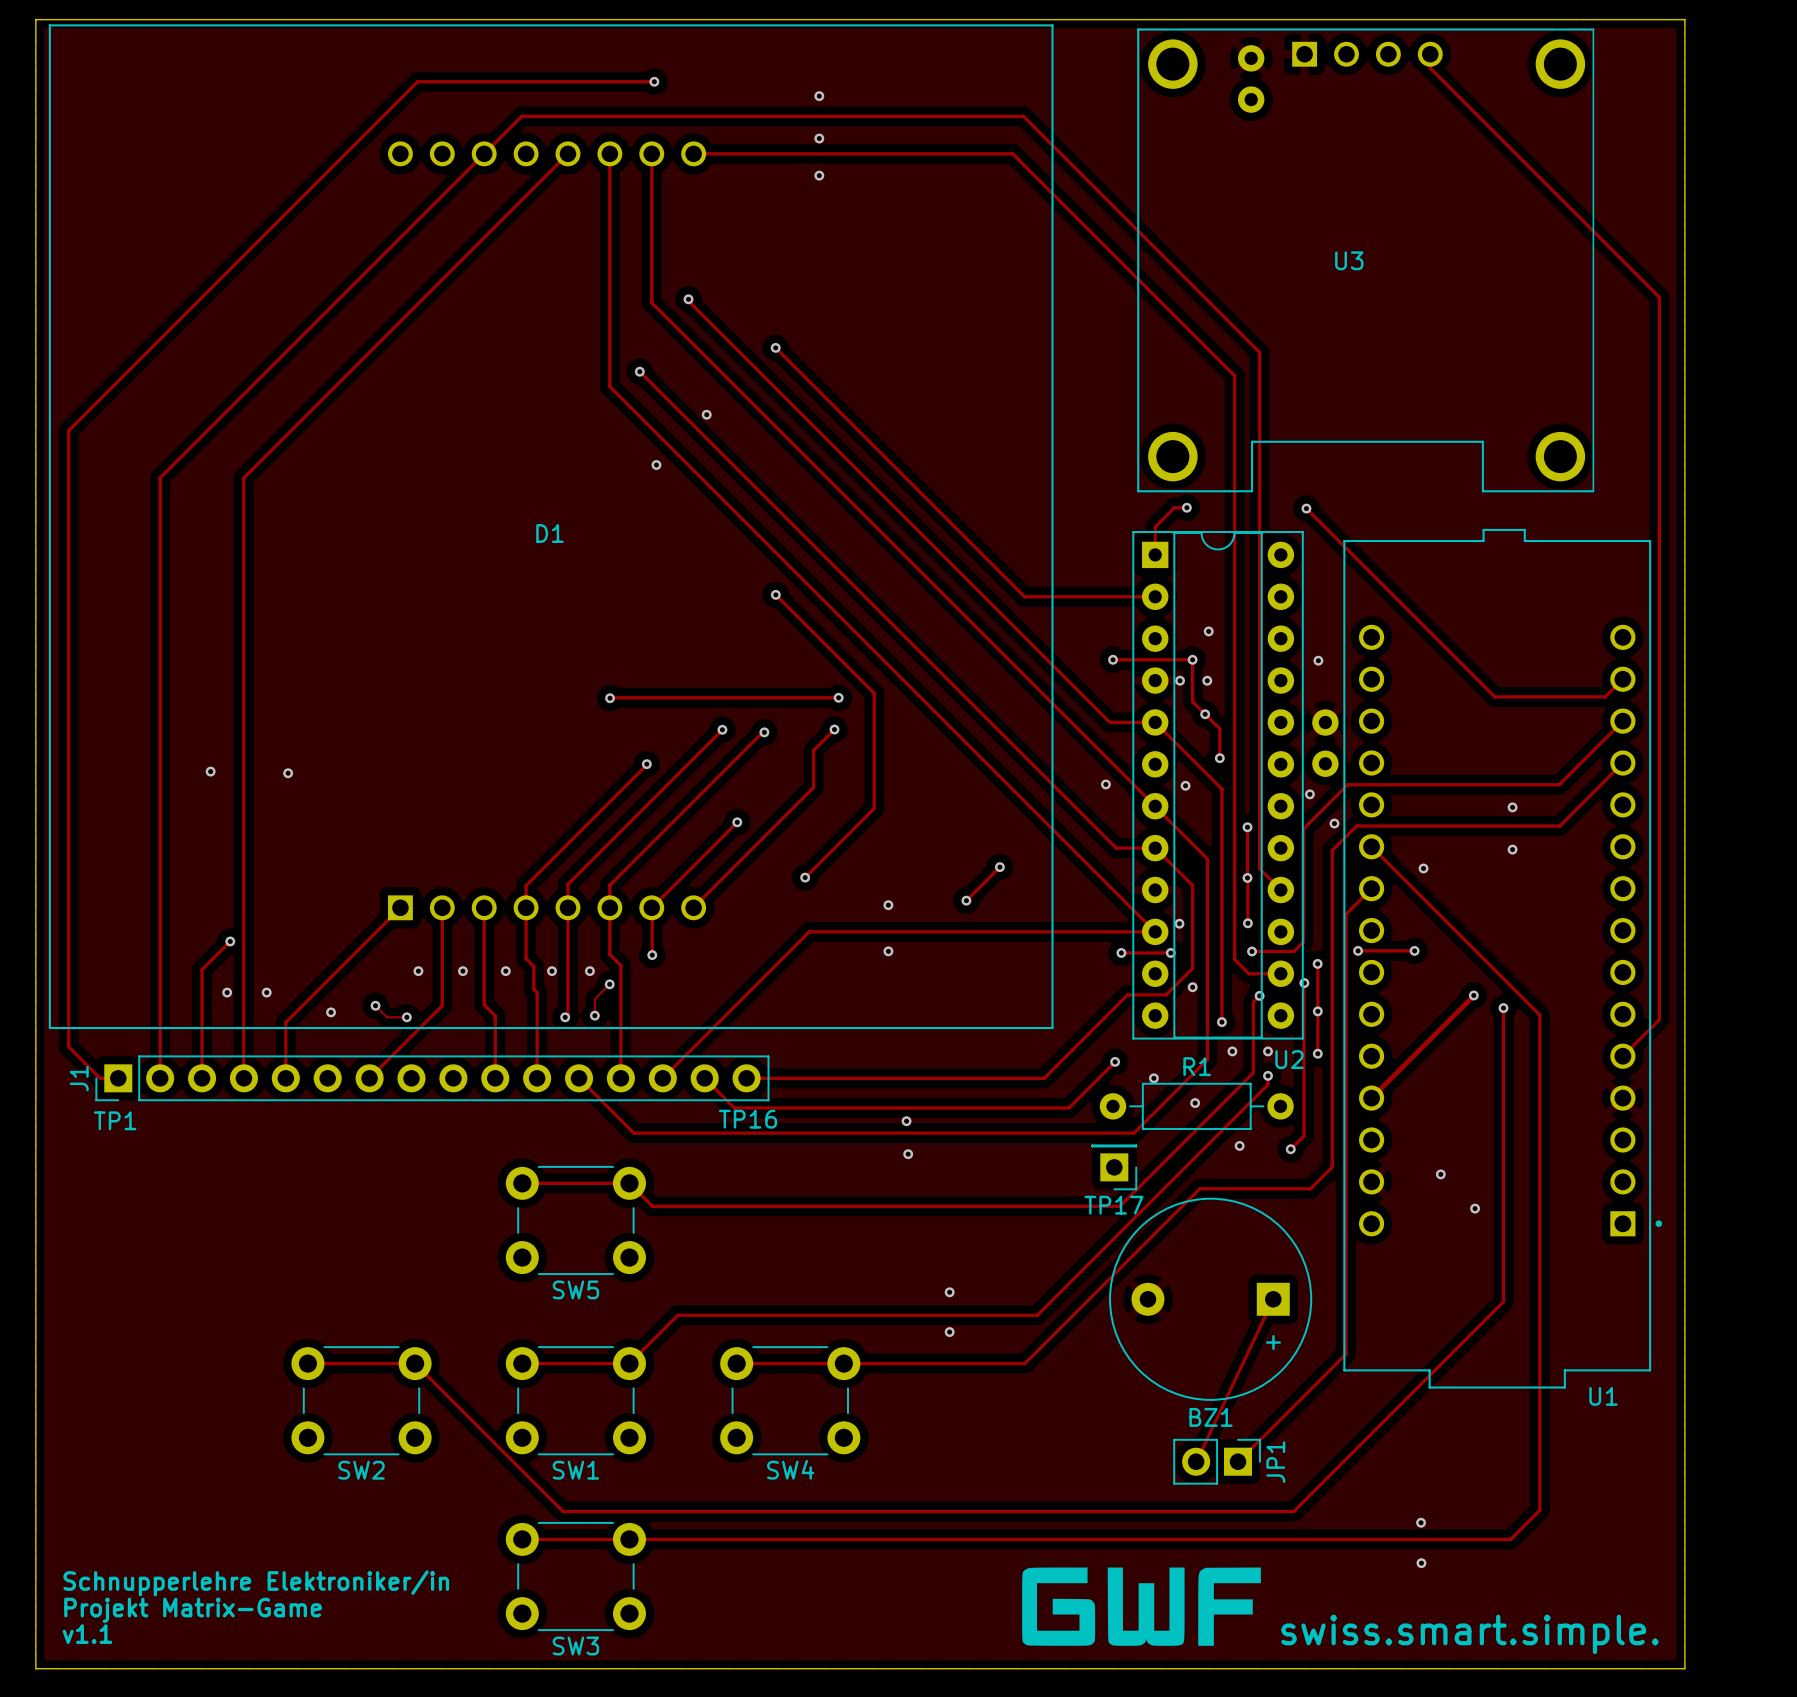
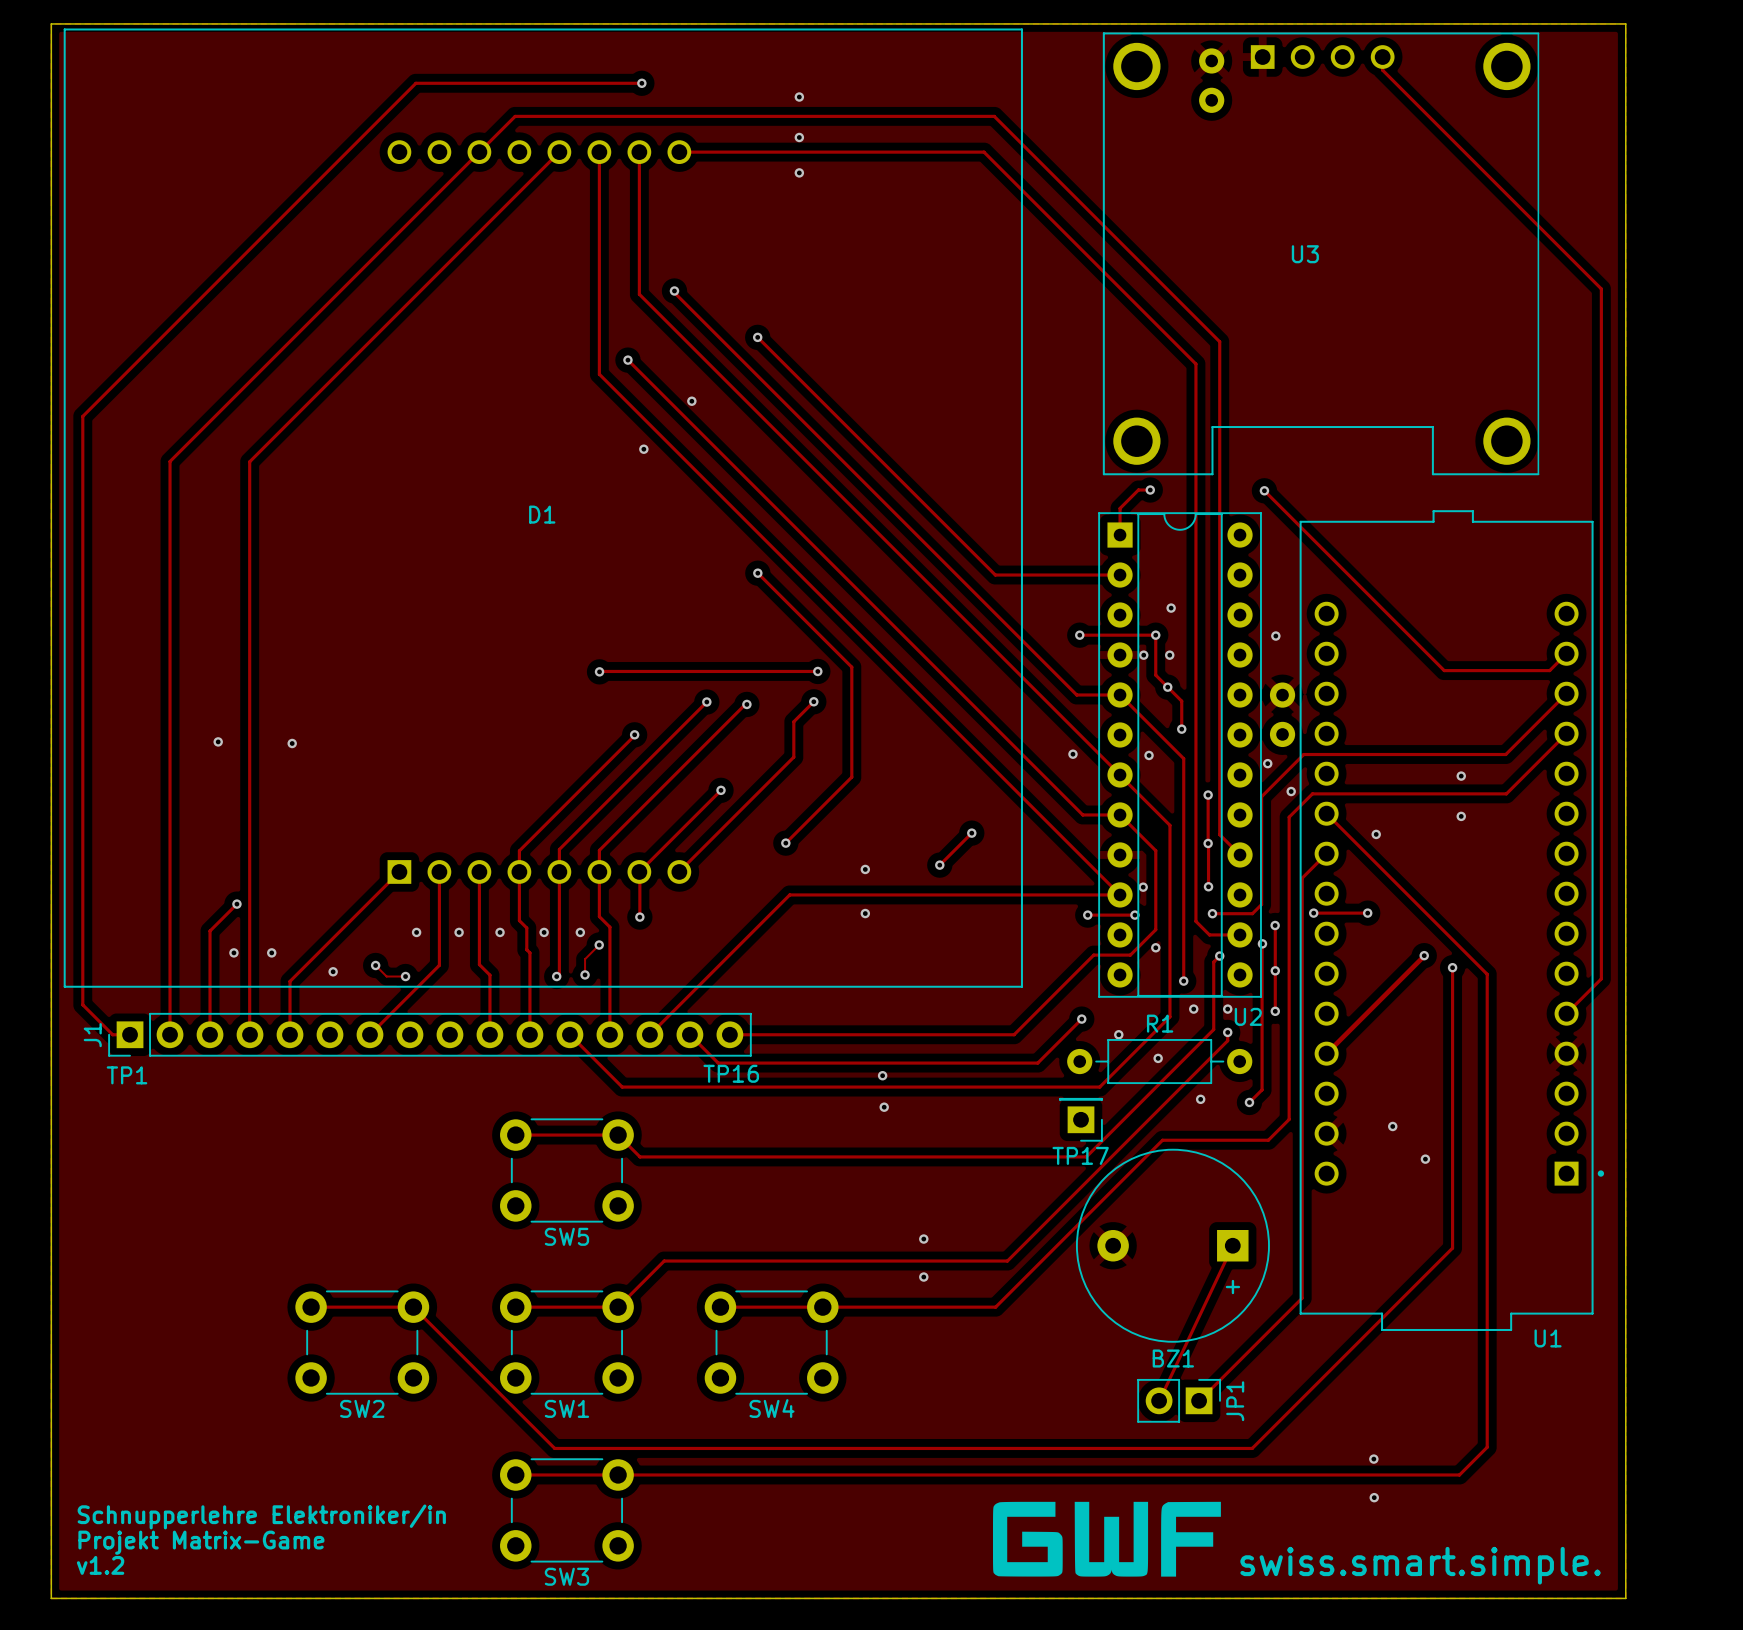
text: v1.1 (87, 1634) -> v1.2 (100, 1565)

